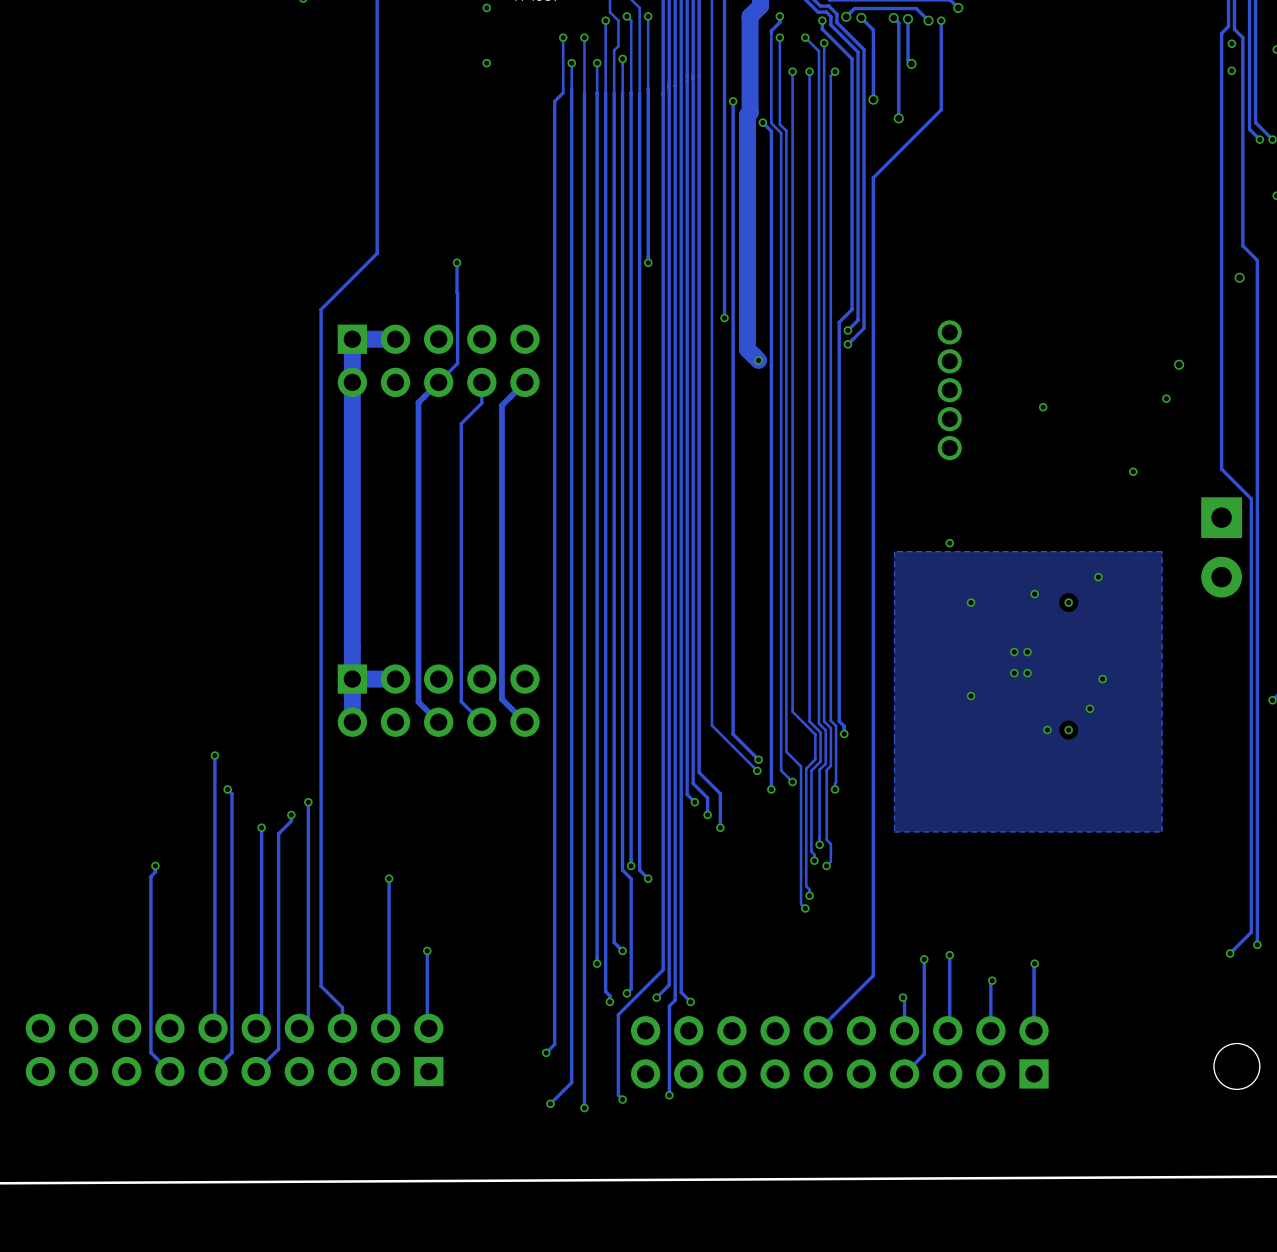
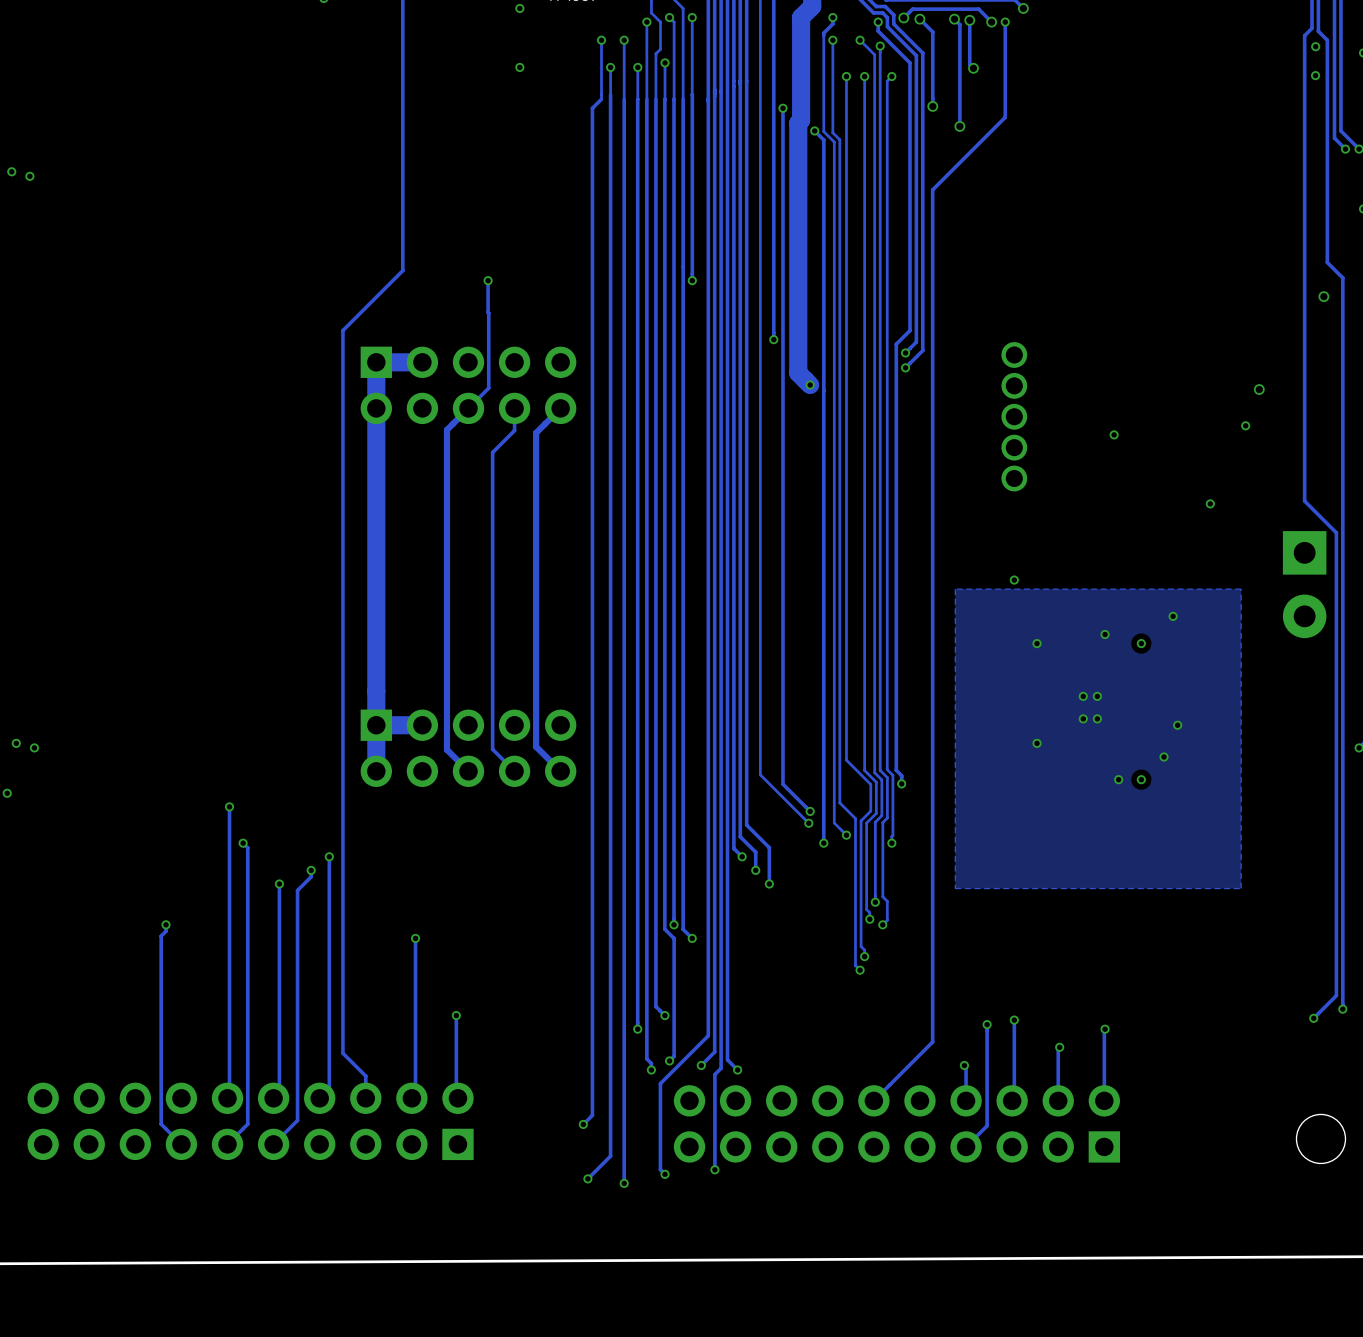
via: none -> (11, 171)
via: none -> (29, 176)
via: none -> (16, 743)
via: none -> (34, 747)
via: none -> (7, 793)

